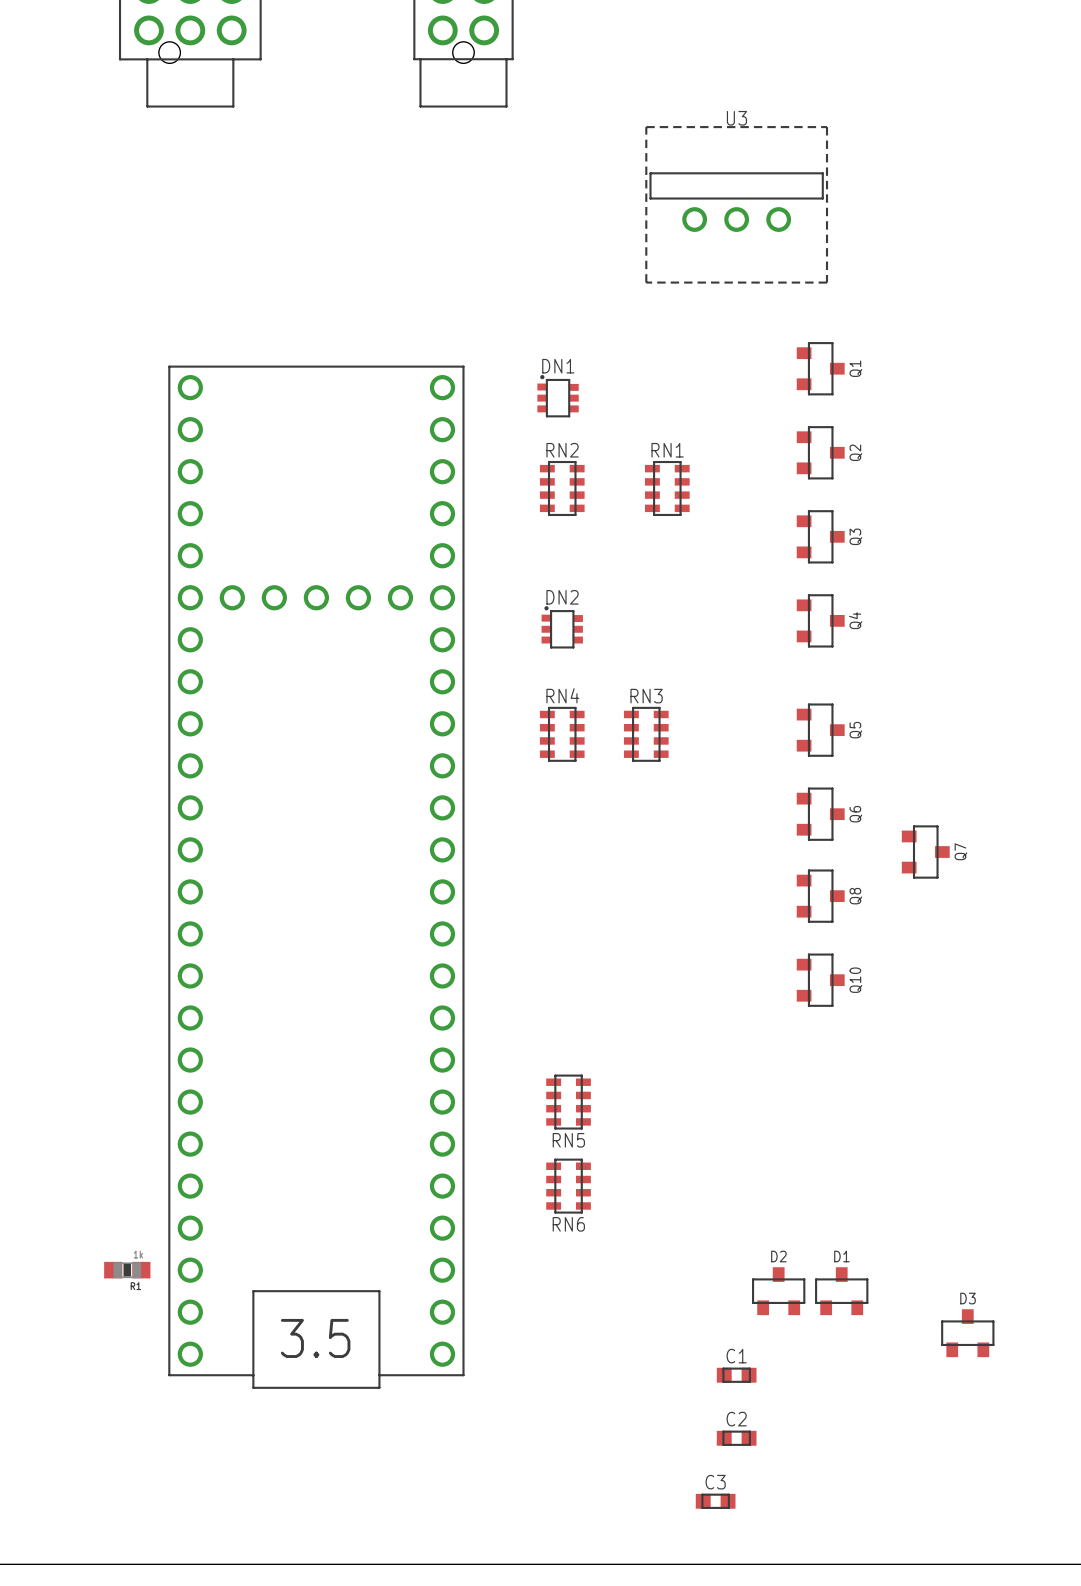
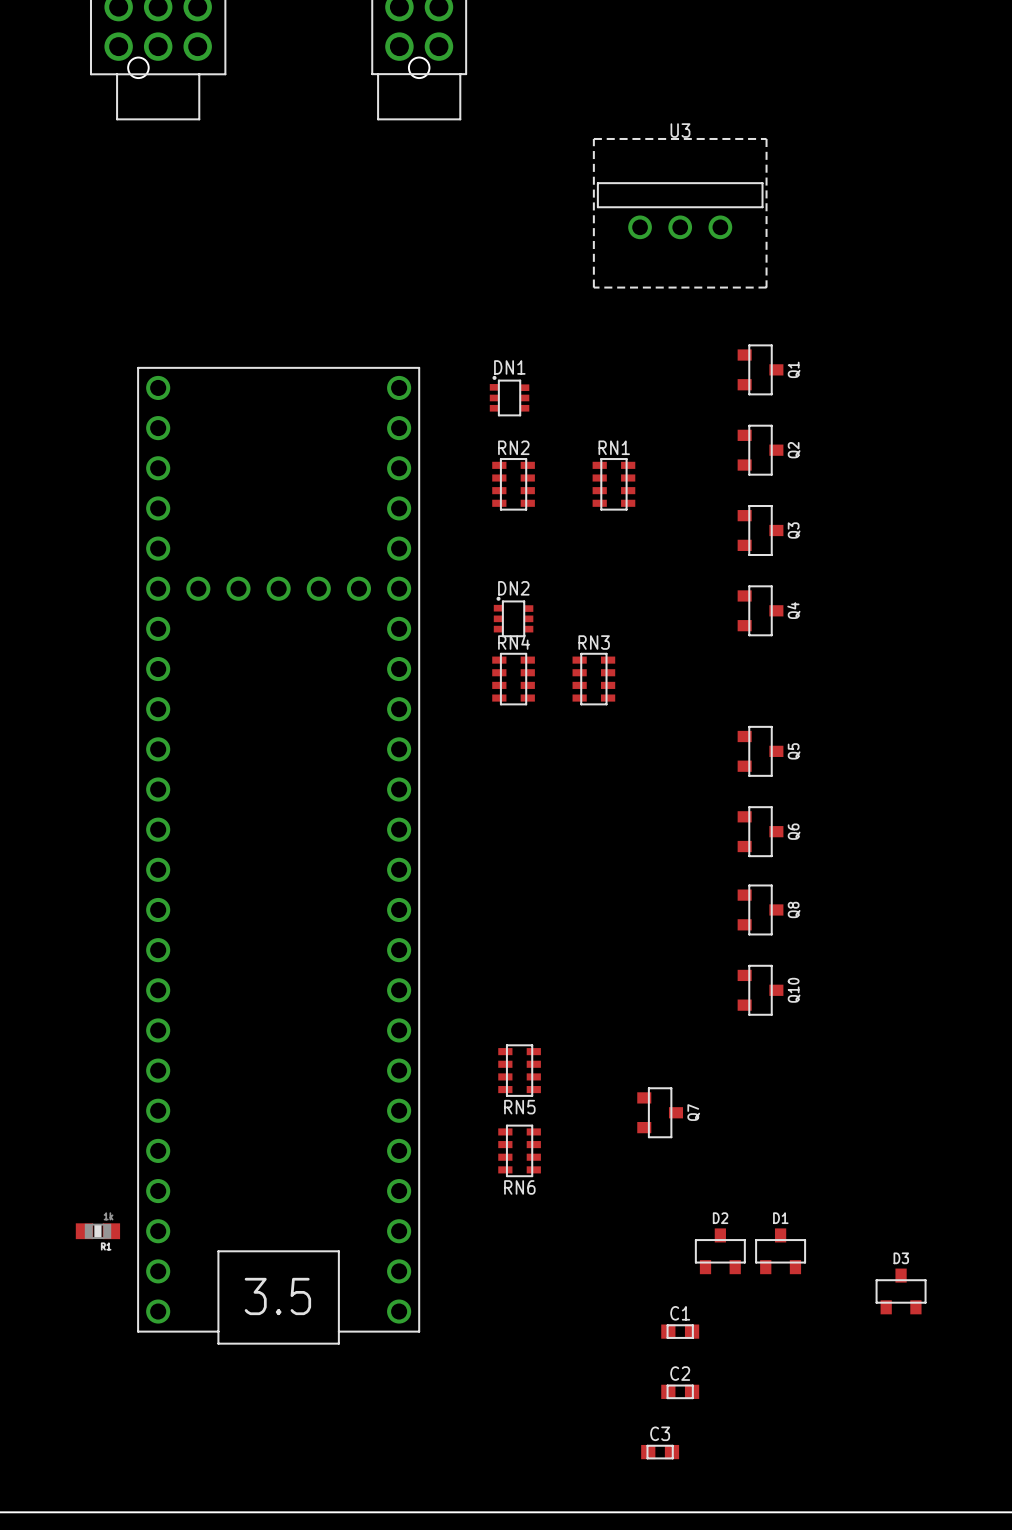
Q5 position: (820, 730) -> (760, 751)
RN4 position: (562, 734) -> (513, 679)
RN3 position: (646, 734) -> (593, 679)
Q6 position: (820, 814) -> (760, 831)
Q7 position: (925, 852) -> (660, 1112)
Q8 position: (820, 896) -> (760, 909)
Q10 position: (820, 980) -> (760, 990)

